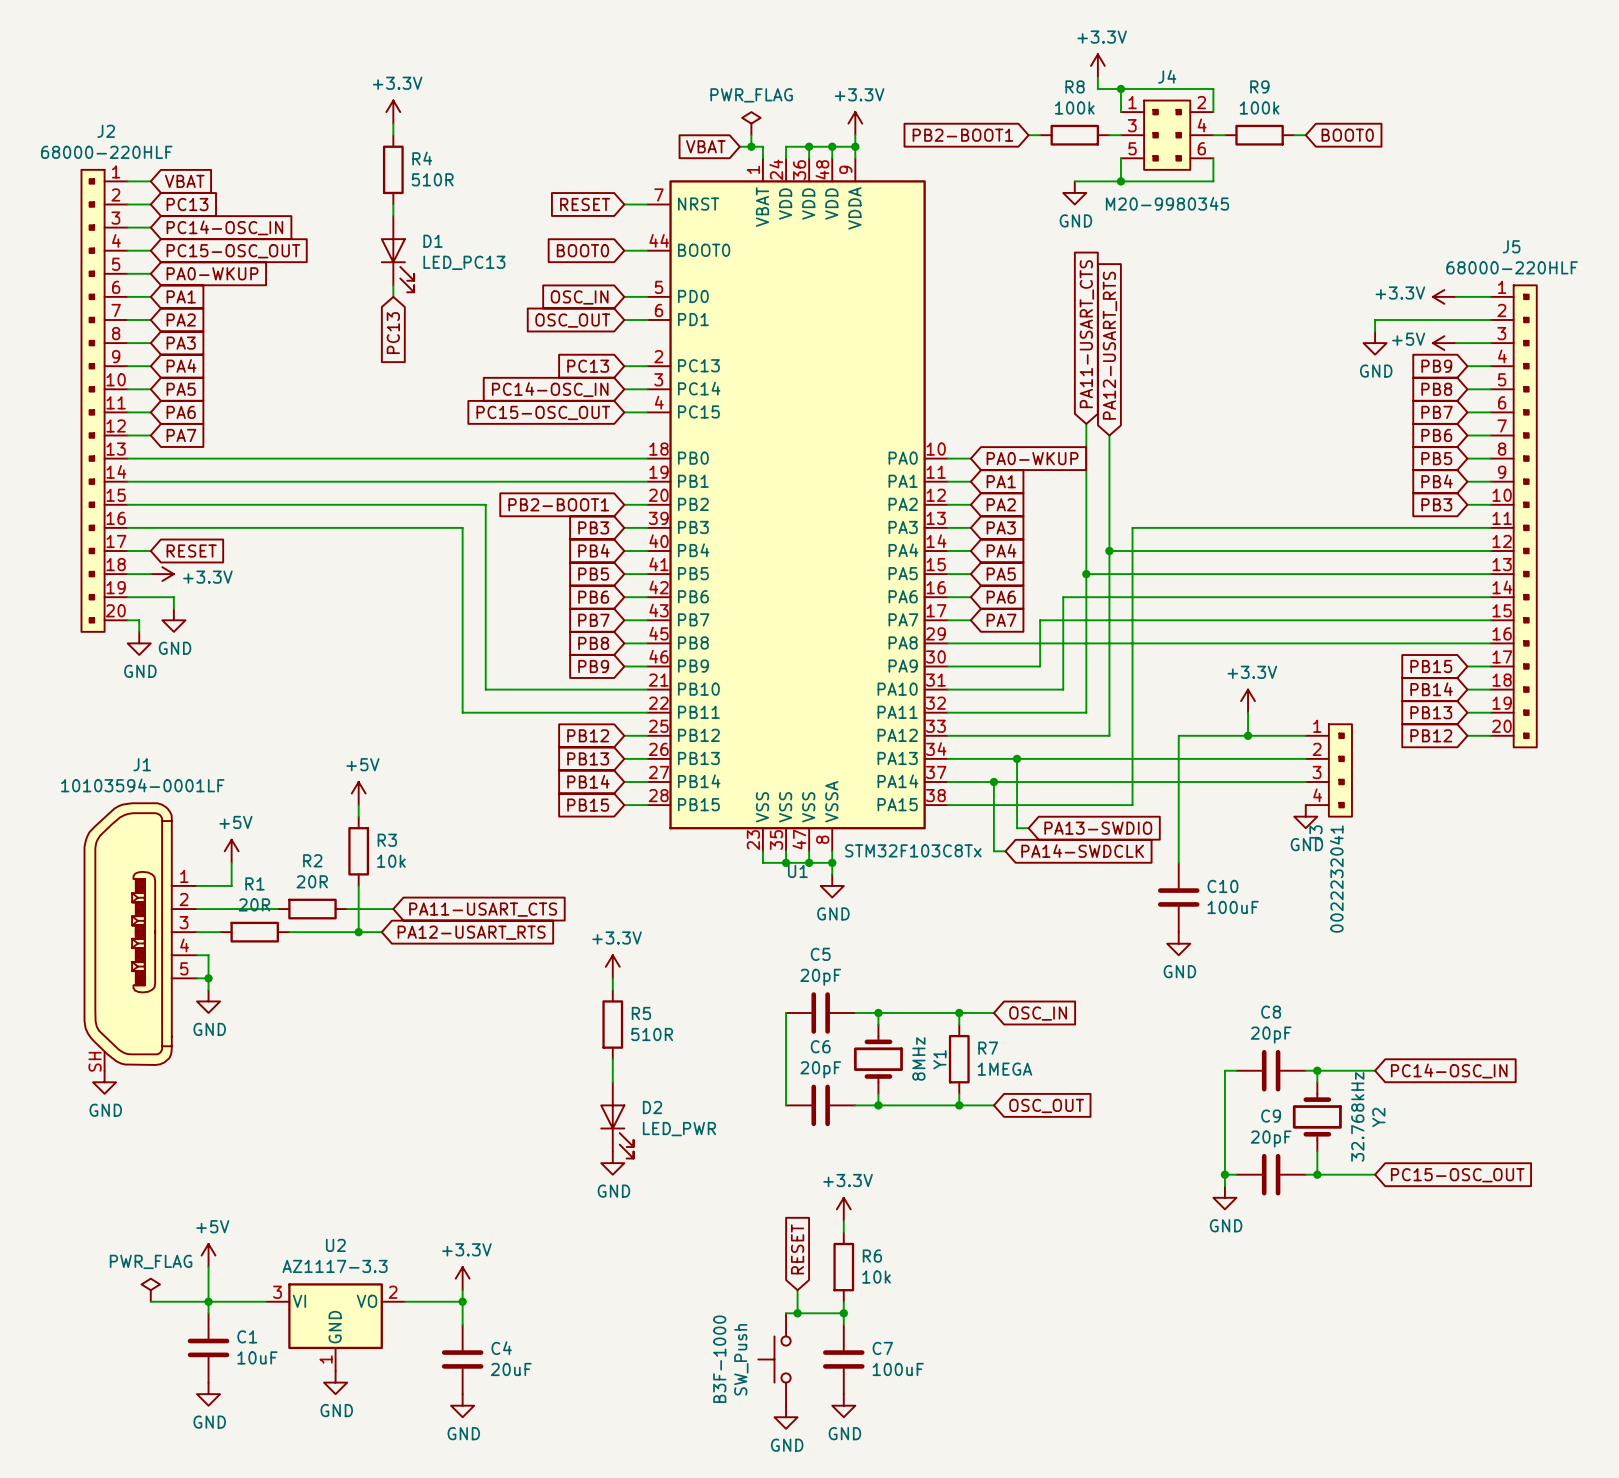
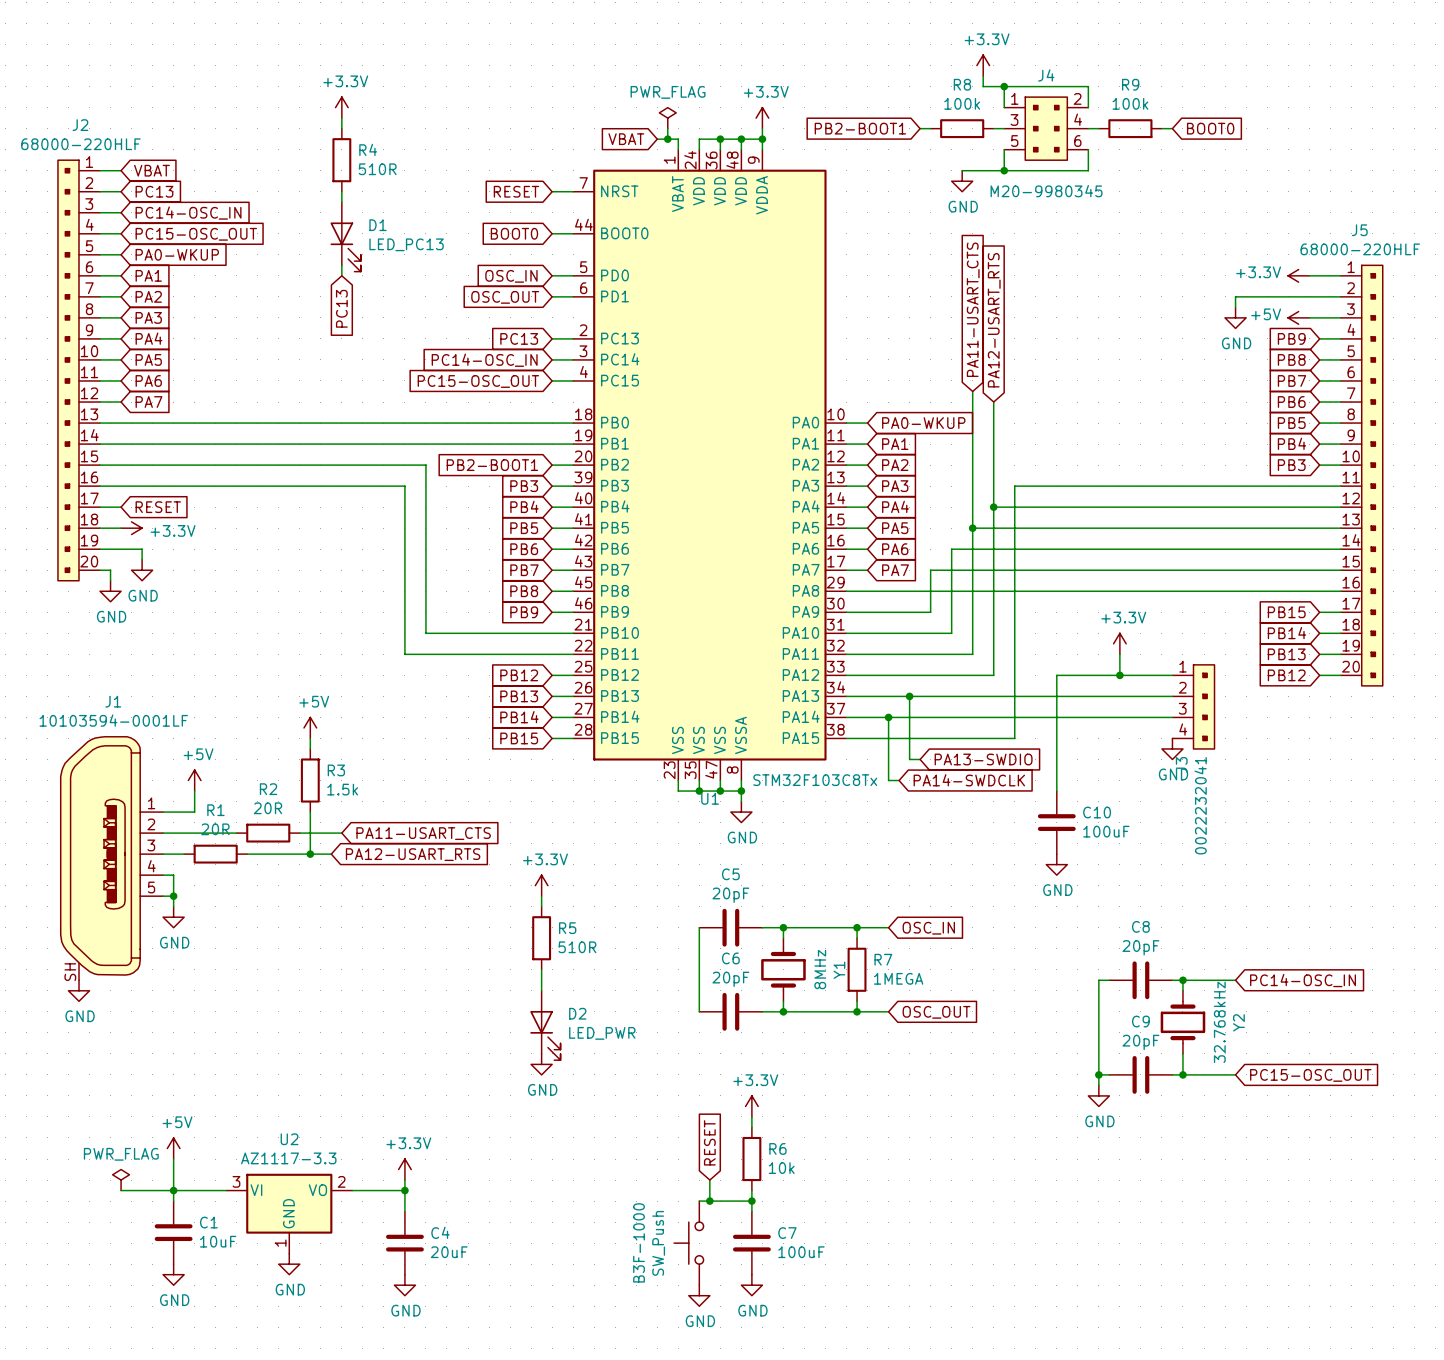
R3 value: 10k (391, 861) -> 1.5k (342, 789)

